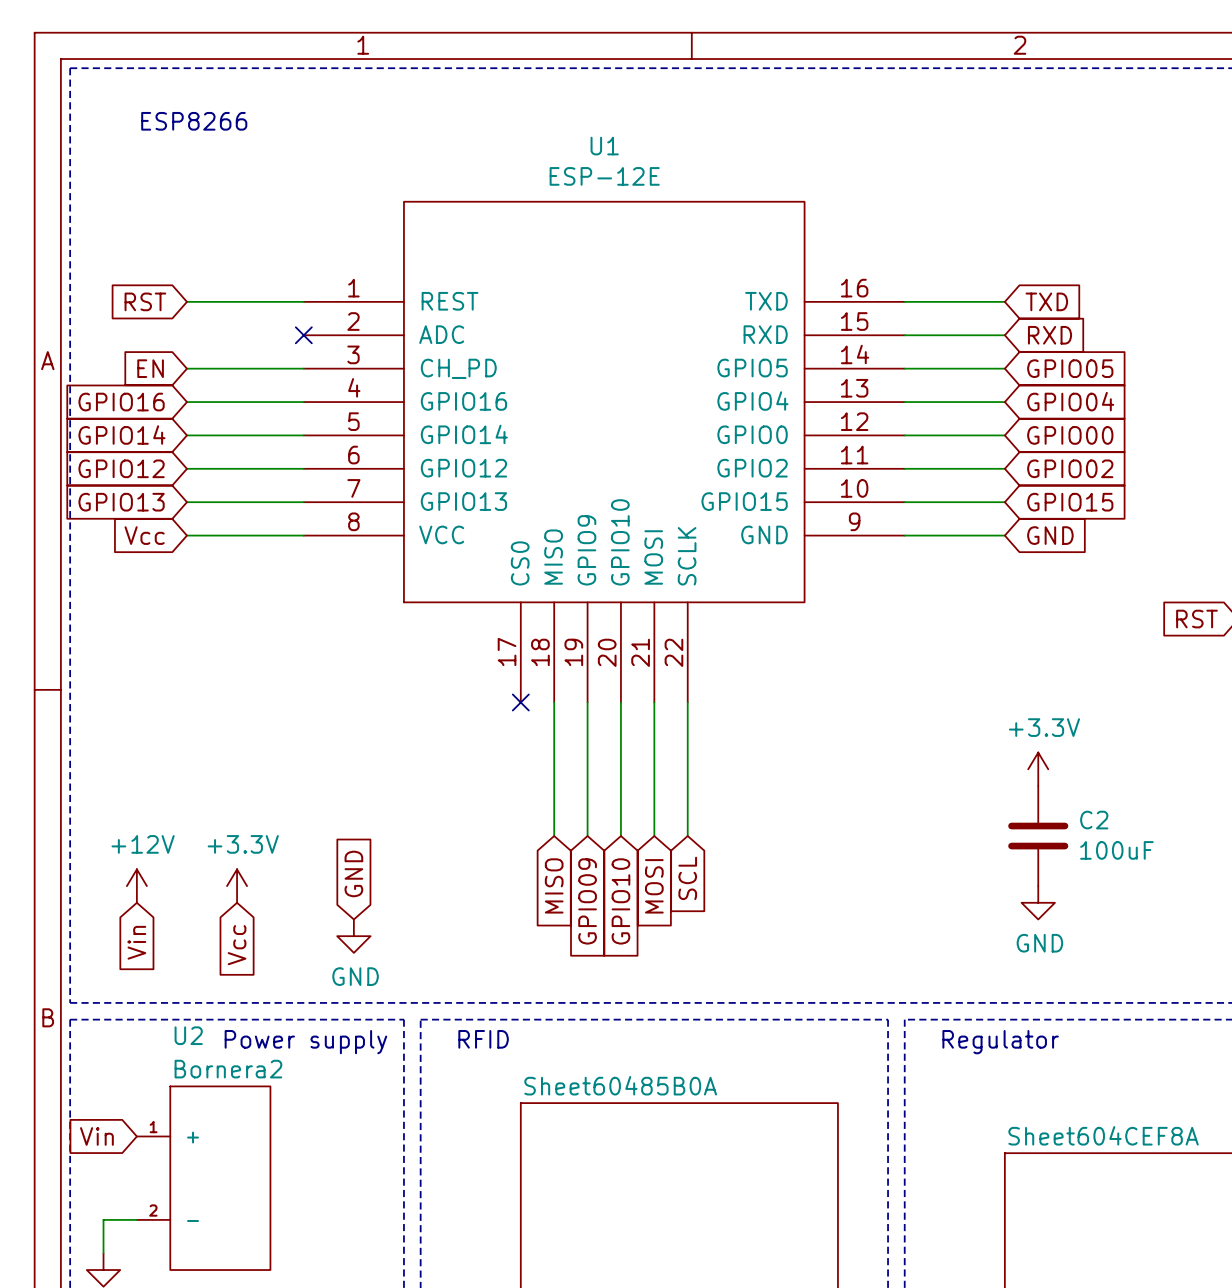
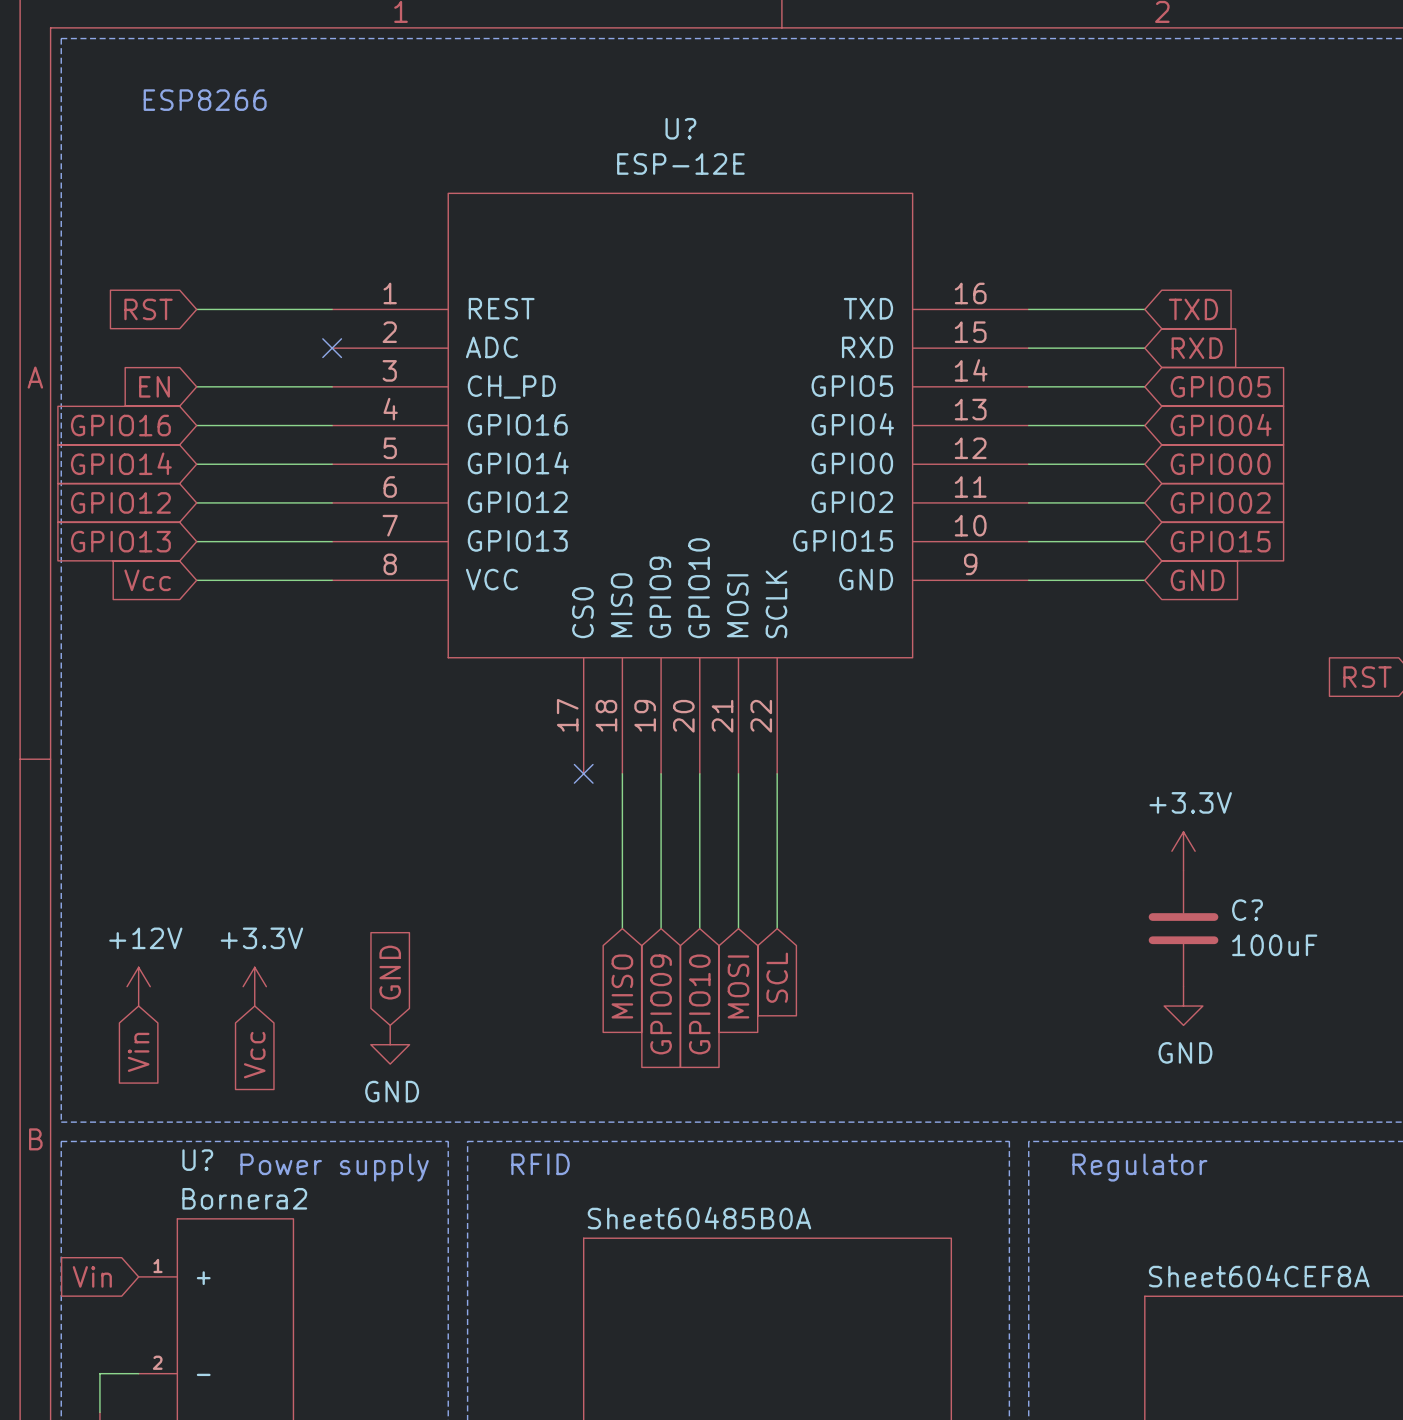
U1 name: U1 (604, 146) -> U? (680, 128)
C2 name: C2 (1094, 820) -> C? (1247, 910)
U2 name: U2 (188, 1035) -> U? (197, 1160)

